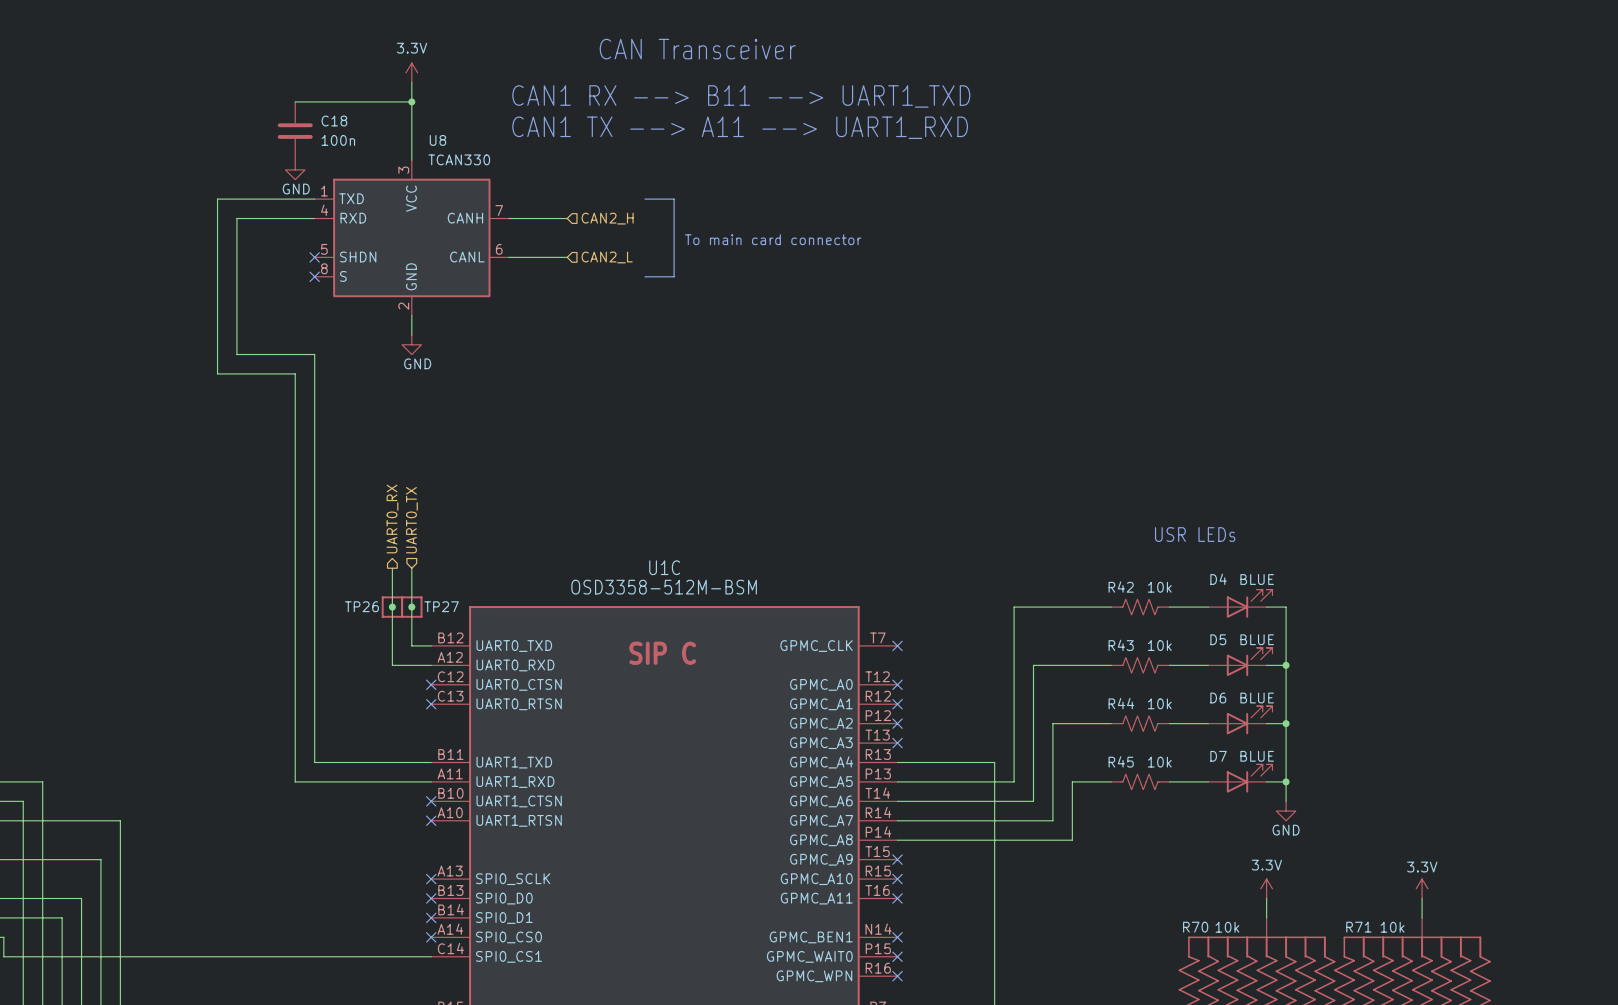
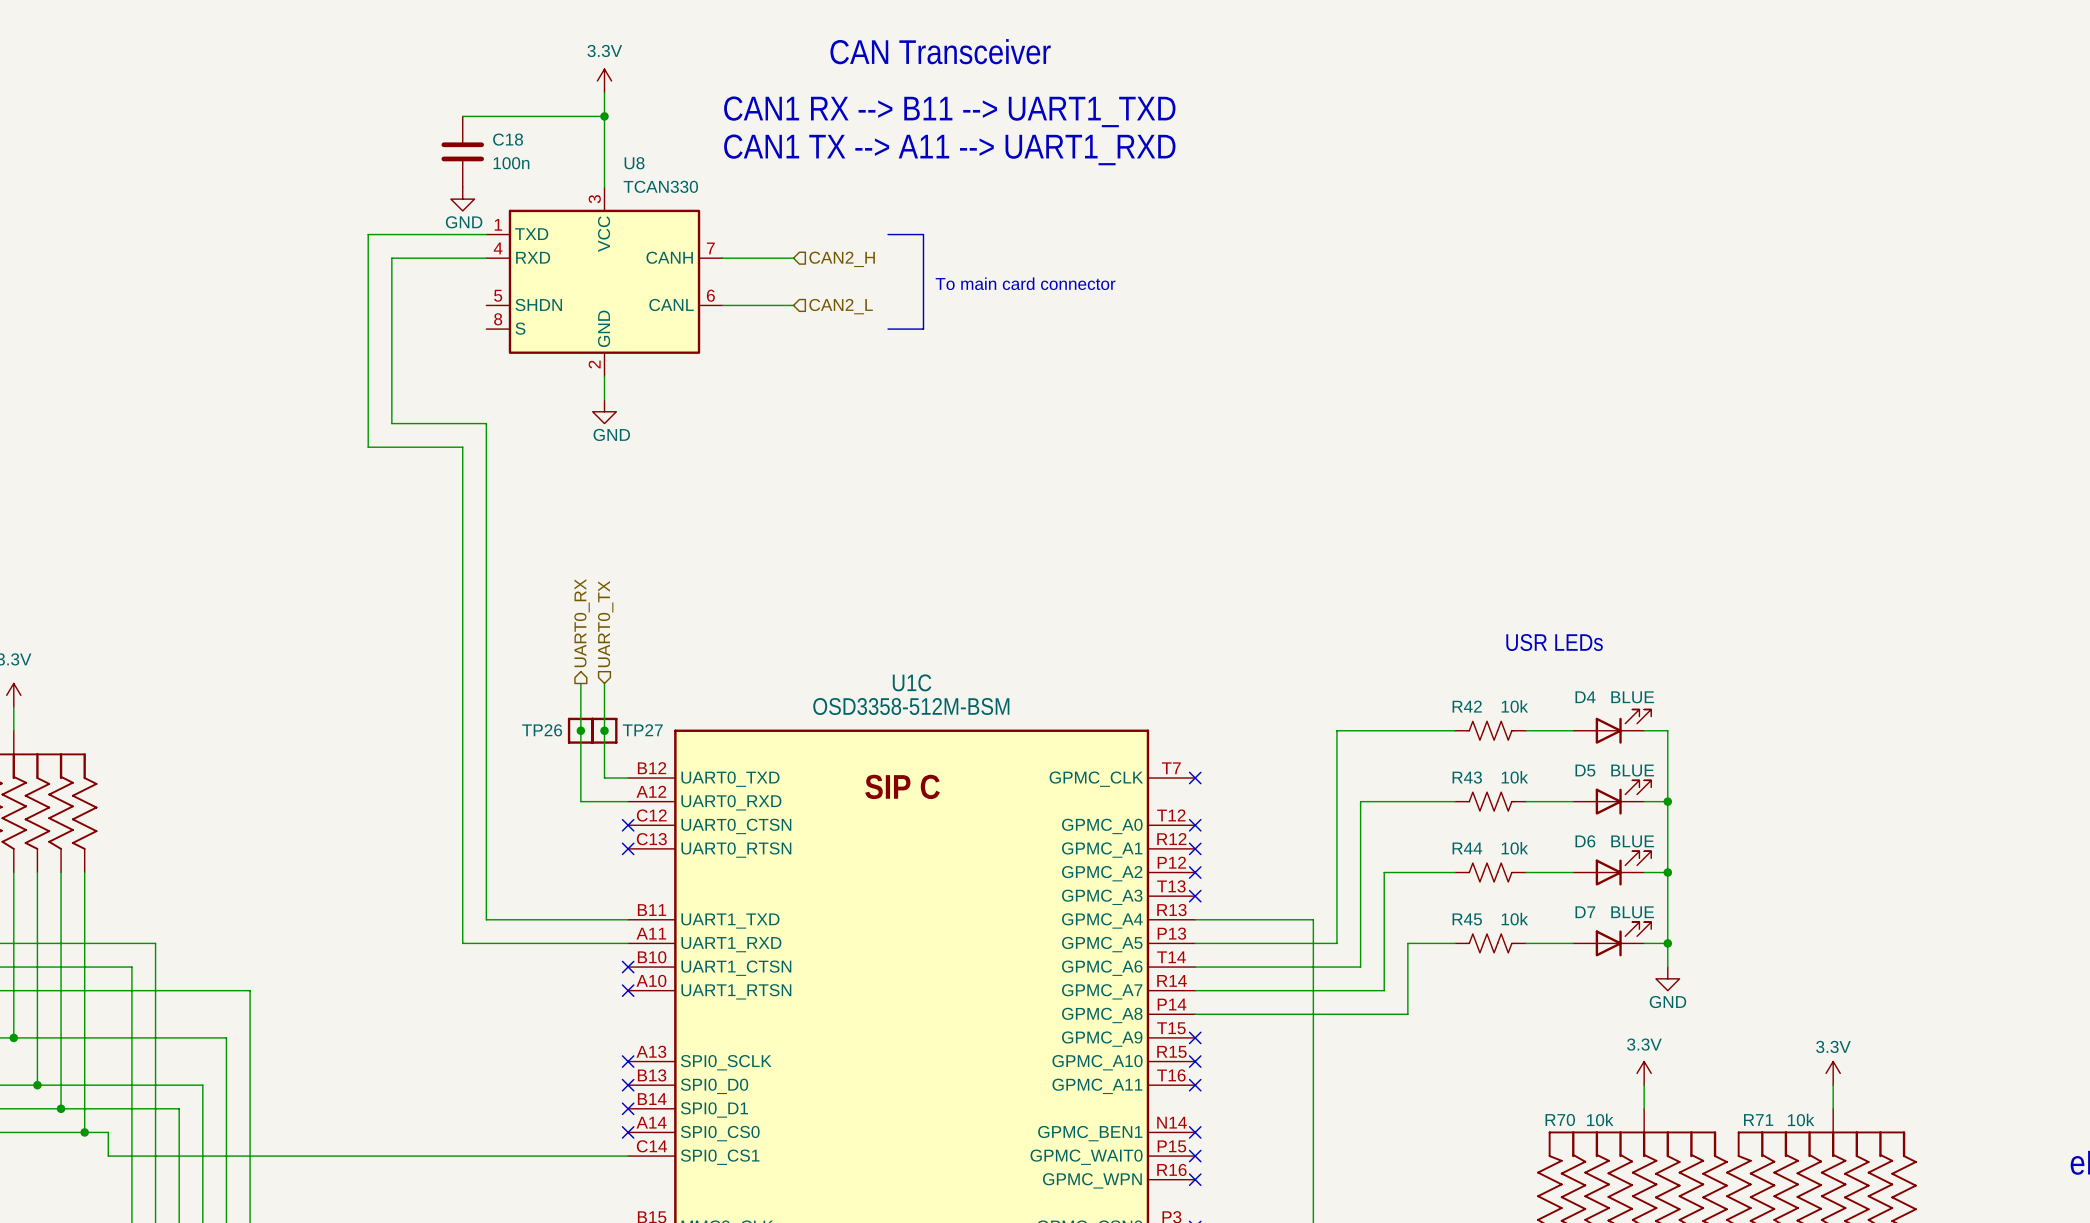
no-connect mark: (314, 257) -> none
no-connect mark: (314, 276) -> none

